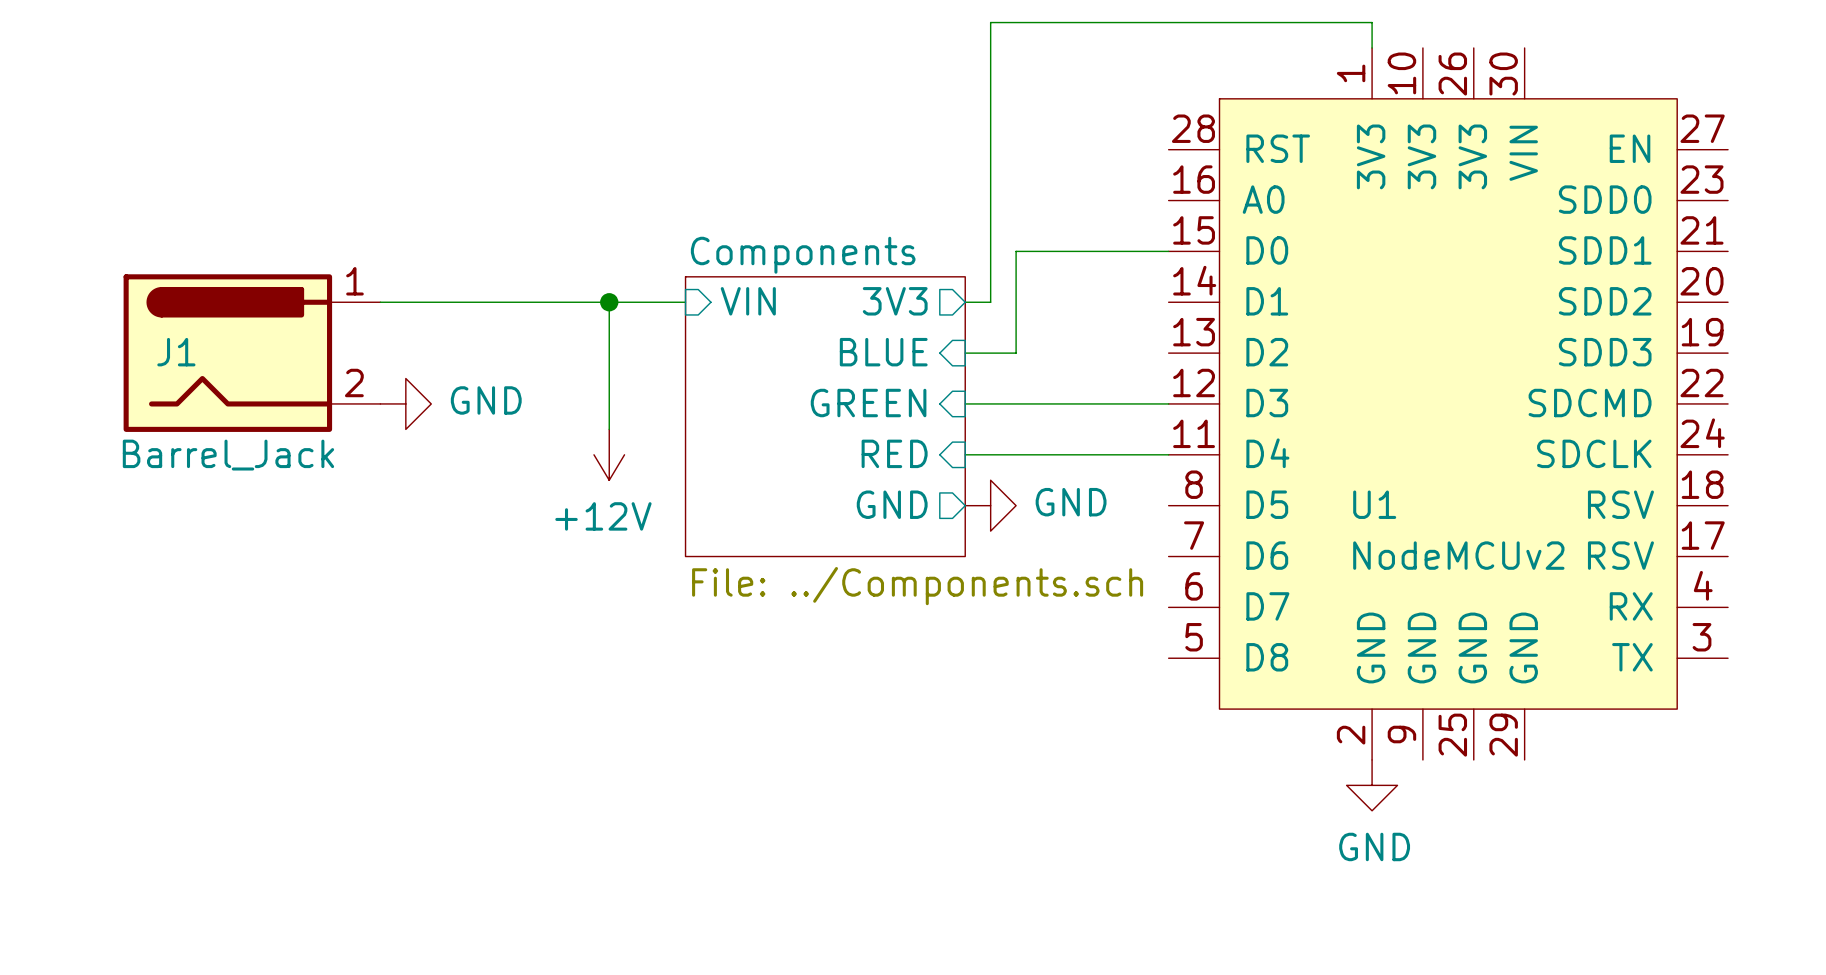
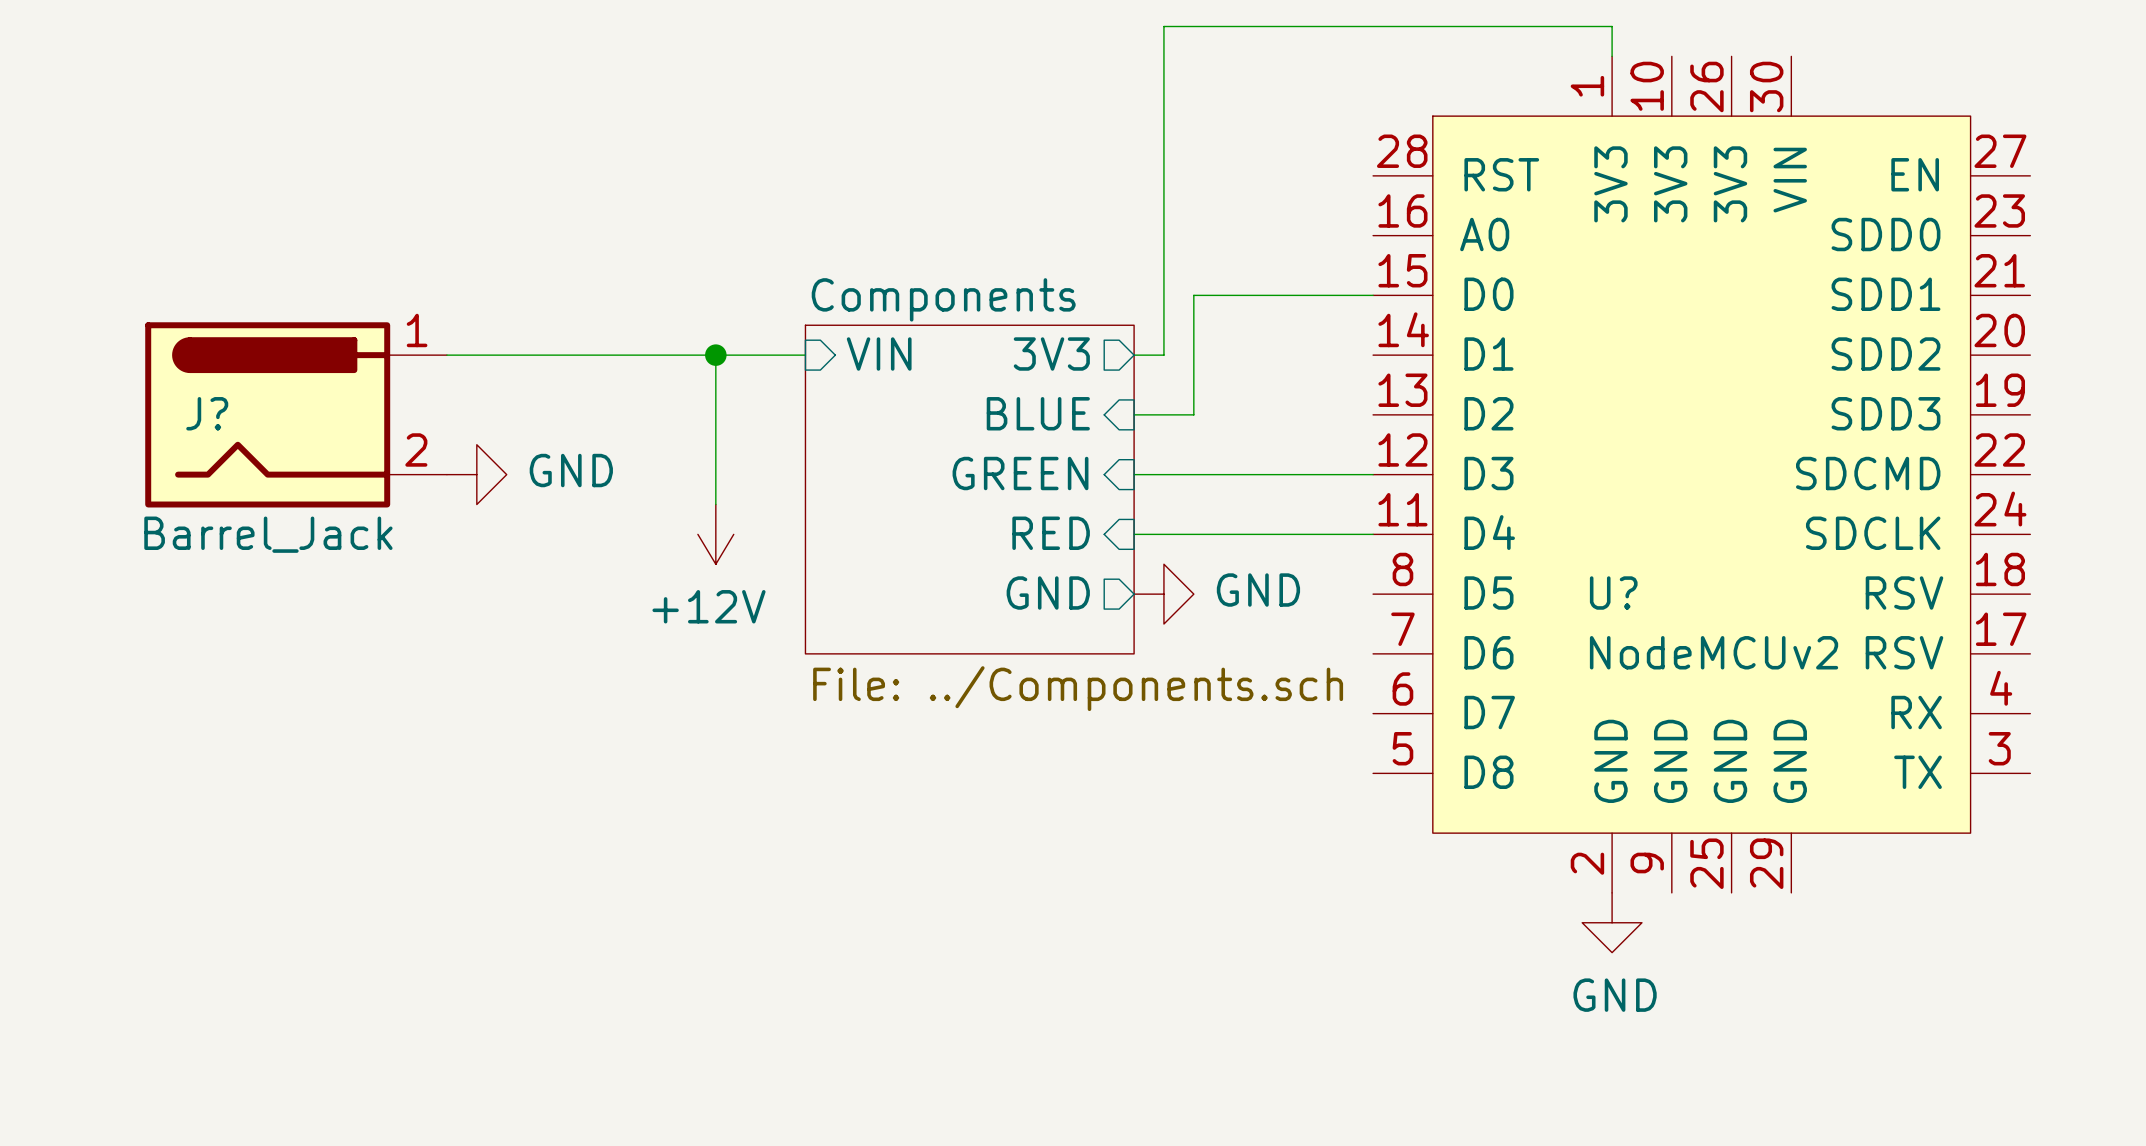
J1 name: J1 (176, 352) -> J? (207, 413)
U1 name: U1 (1374, 504) -> U? (1613, 593)

